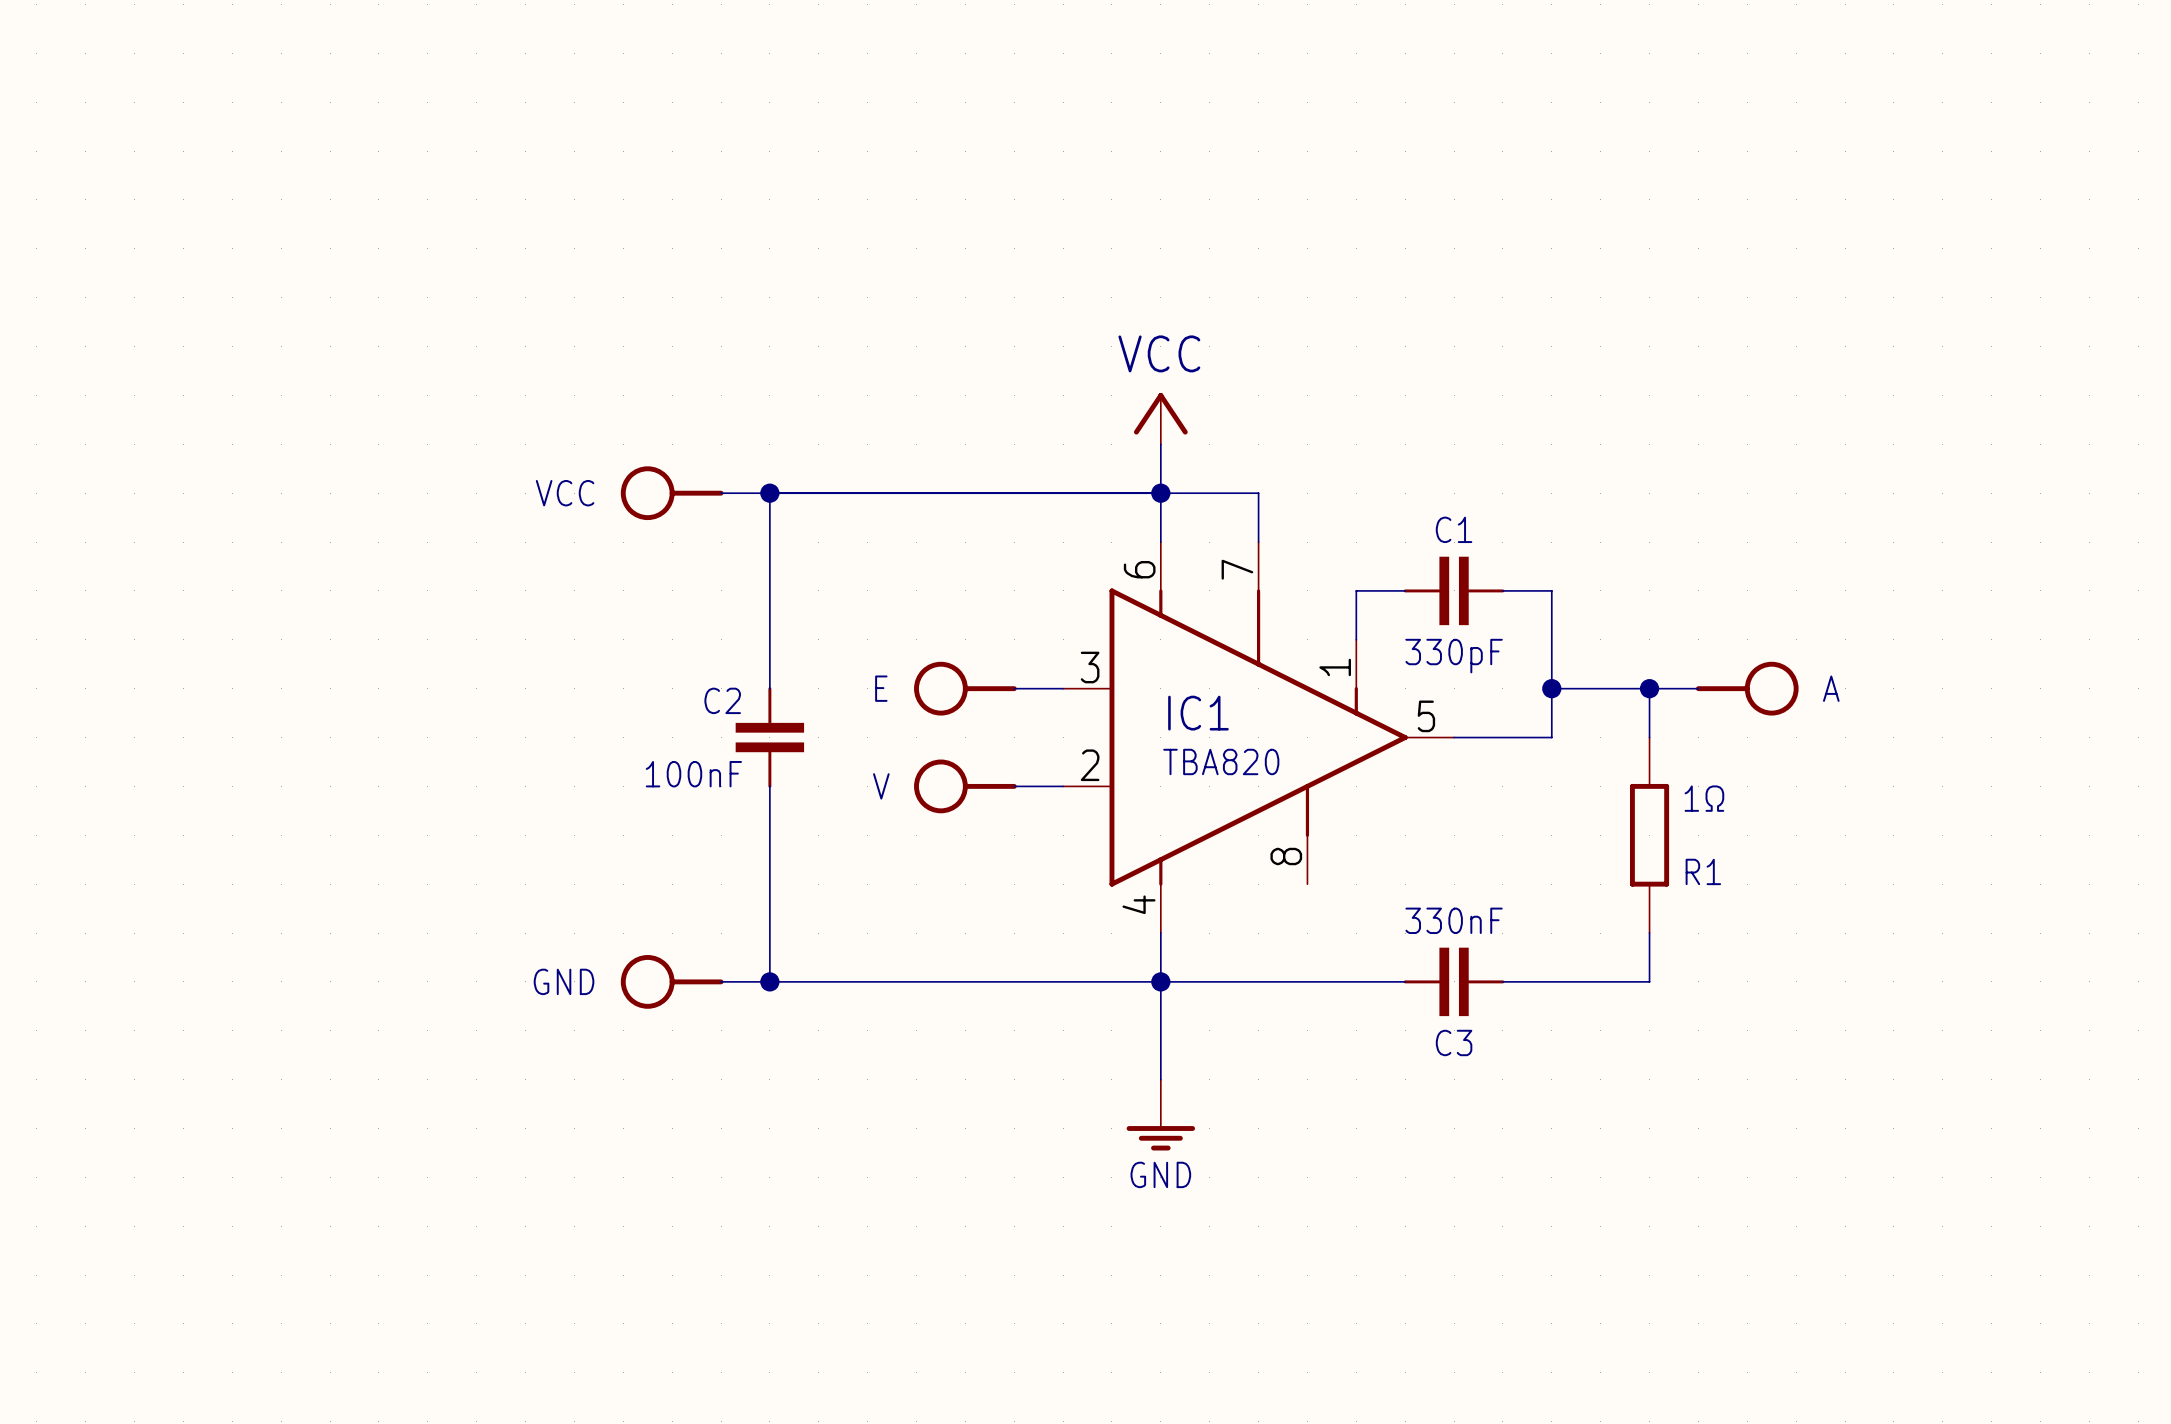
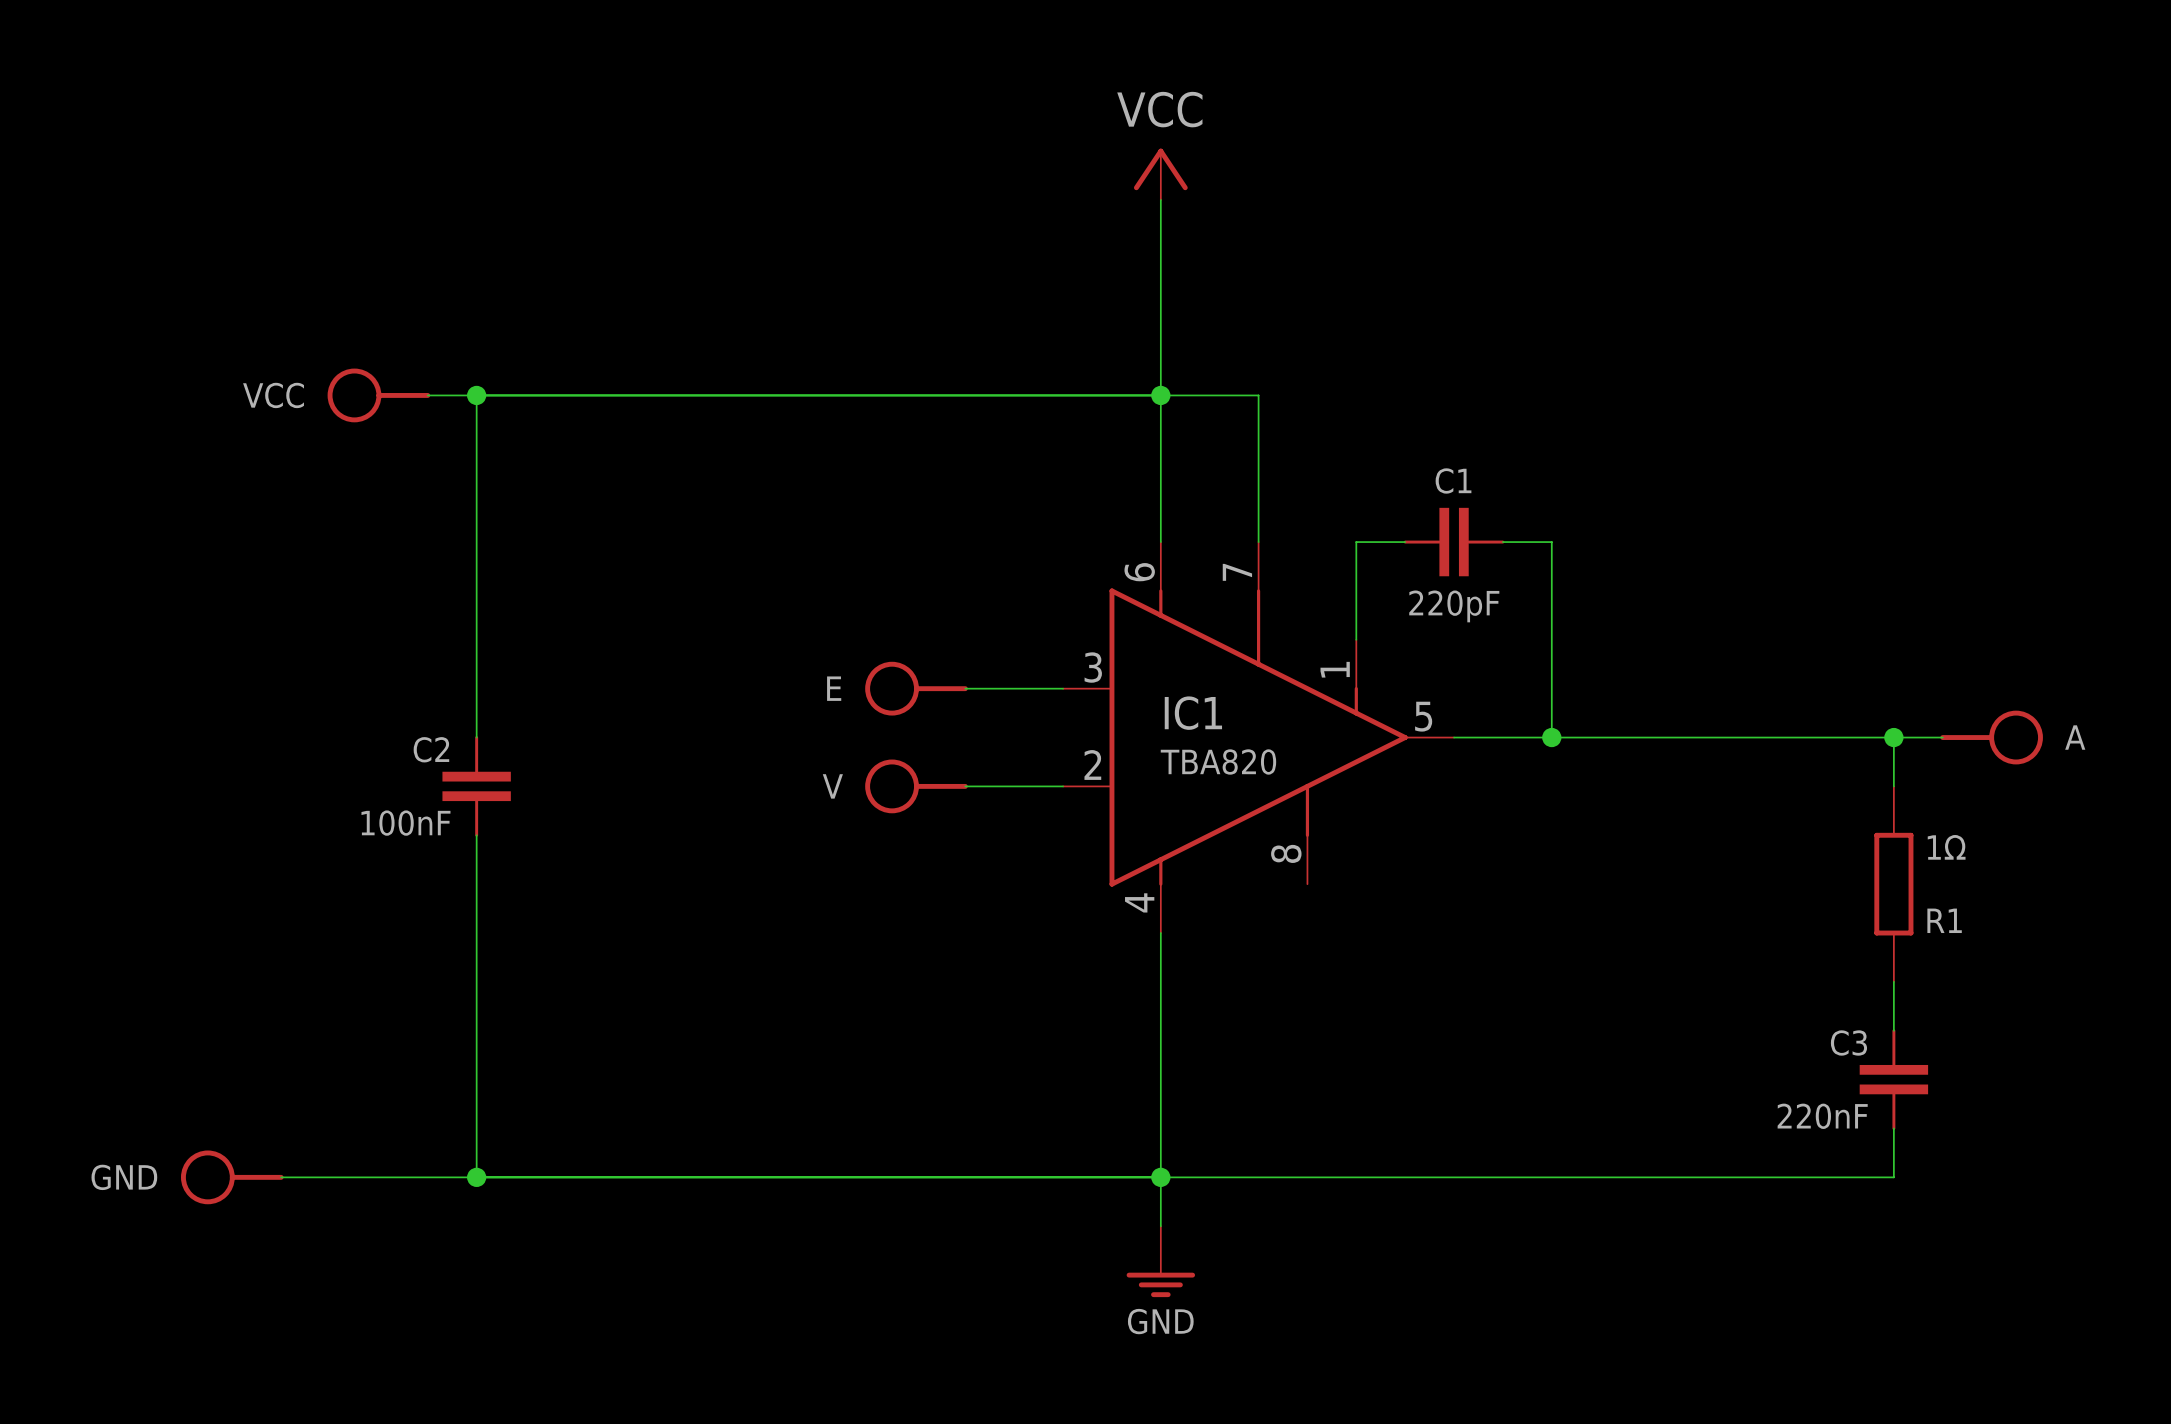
wire: none -> (1160, 199) (1160, 444)
wire: none -> (476, 395) (476, 737)
junction: none -> (476, 395)
power symbol position: VCC (1160, 418) -> VCC (1160, 174)
VCC position: (672, 493) -> (378, 395)
wire: (721, 493) (1258, 493) -> (427, 395) (1258, 395) (1258, 493)
wire: (769, 493) (769, 688) -> none
junction: (769, 493) -> none
junction position: (1160, 493) -> (1160, 395)
wire: (1356, 590) (1405, 590) -> (1356, 590) (1356, 542) (1405, 542)
C1 position: (1454, 590) -> (1454, 542)
wire: (1502, 590) (1551, 590) -> (1502, 542) (1551, 542) (1551, 590)
C1 value: 330pF (1454, 656) -> 220pF (1454, 606)
E position: (965, 688) -> (916, 688)
wire: (1551, 688) (1698, 688) -> none
junction position: (1551, 688) -> (1551, 737)
wire: (1649, 688) (1649, 737) -> (1893, 737) (1893, 786)
junction: (1649, 688) -> none
A position: (1747, 688) -> (1991, 737)
C2 position: (769, 737) -> (476, 786)
wire: none -> (1551, 737) (1942, 737)
junction: none -> (1893, 737)
wire: (769, 786) (769, 981) -> none
V position: (965, 786) -> (916, 786)
wire: none -> (476, 835) (476, 1177)
R1 position: (1649, 835) -> (1893, 884)
C3 value: 330nF (1454, 920) -> 220nF (1822, 1116)
wire: (1649, 933) (1649, 981) (1502, 981) -> none
GND: (672, 981) -> none
wire: (721, 981) (1405, 981) -> none
junction: (769, 981) -> none
junction: (1160, 981) -> none
C3 rotation: 0° (1454, 981) -> 90° clockwise (1893, 1079)
C3 position: (1454, 981) -> (1893, 1079)
wire: none -> (1893, 981) (1893, 1030)
wire: none -> (1160, 1079) (1160, 1226)
power symbol position: GND (1160, 1115) -> GND (1160, 1261)
wire: none -> (1893, 1128) (1893, 1177) (281, 1177)
GND: none -> (232, 1177)
junction: none -> (476, 1177)
junction: none -> (1160, 1177)

